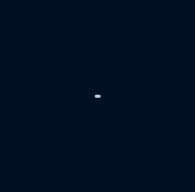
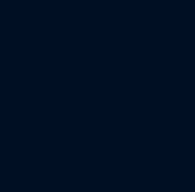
board edge: (96, 96) (99, 96) -> none

